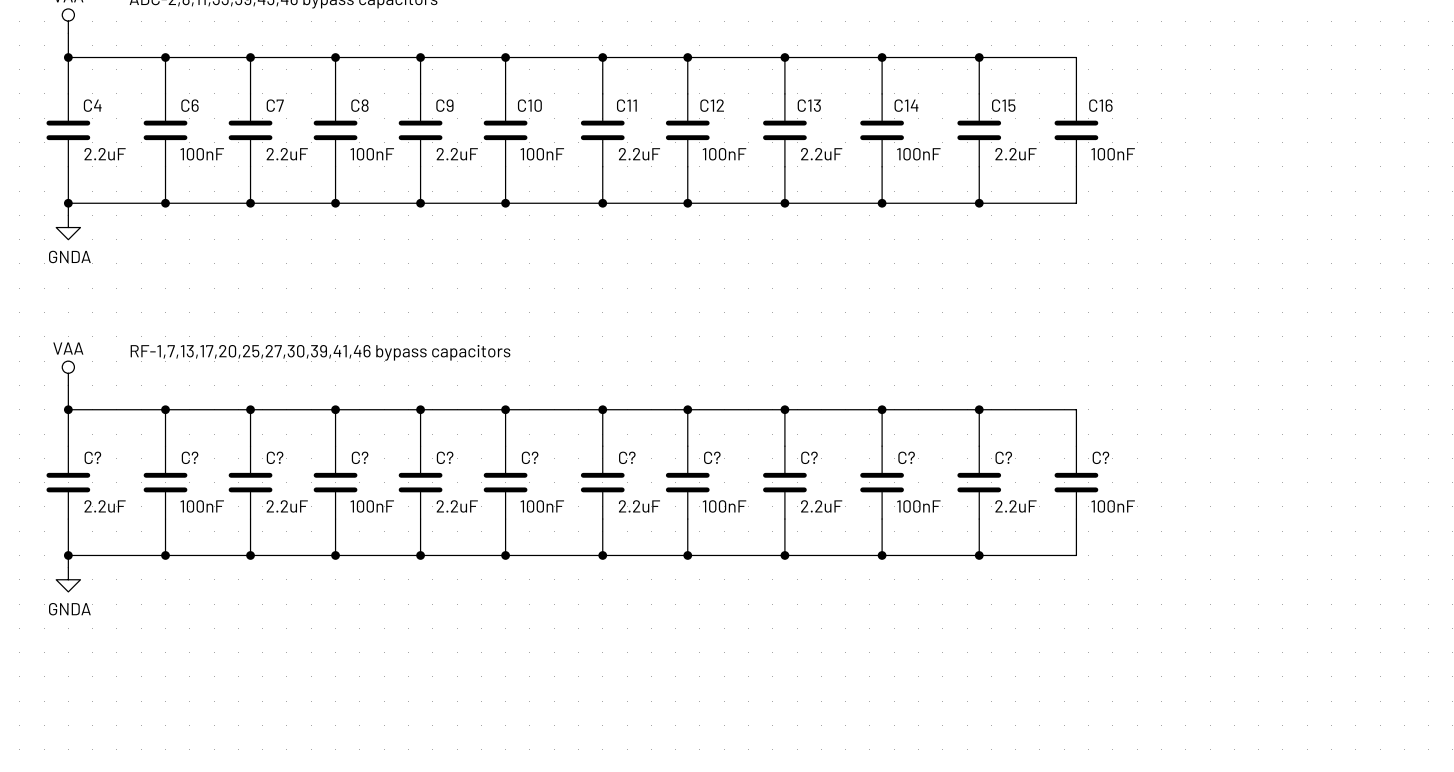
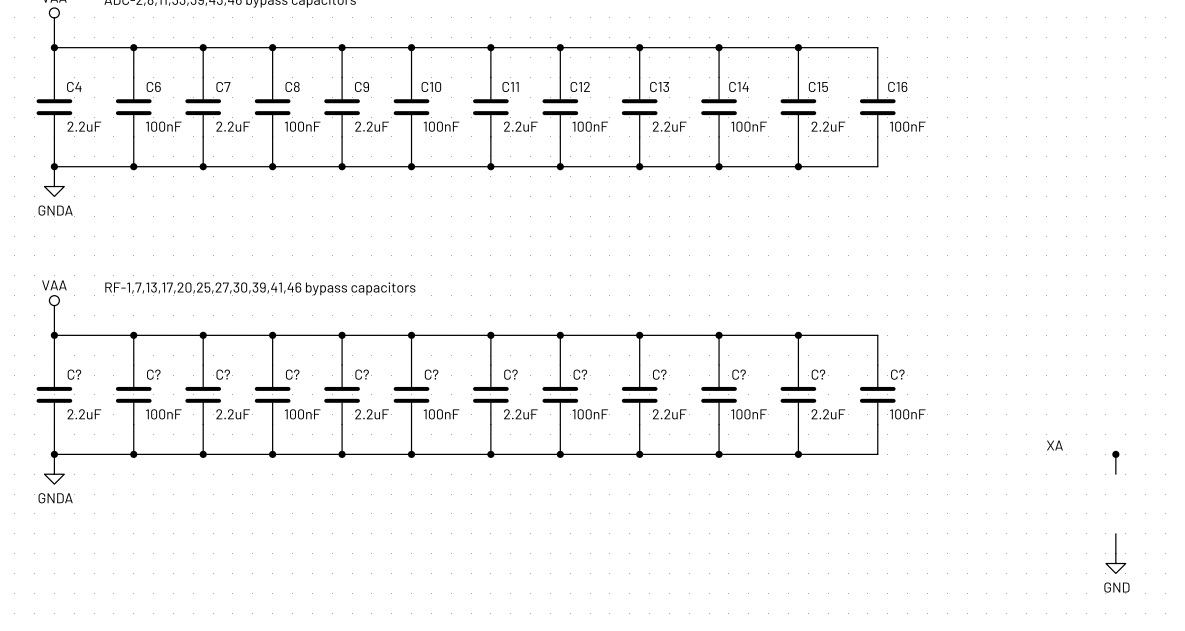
label: none -> XA (1054, 445)
wire: none -> (1115, 454) (1115, 474)
junction: none -> (1115, 454)
wire: none -> (1115, 533) (1115, 553)
power symbol: none -> GND (1115, 563)

